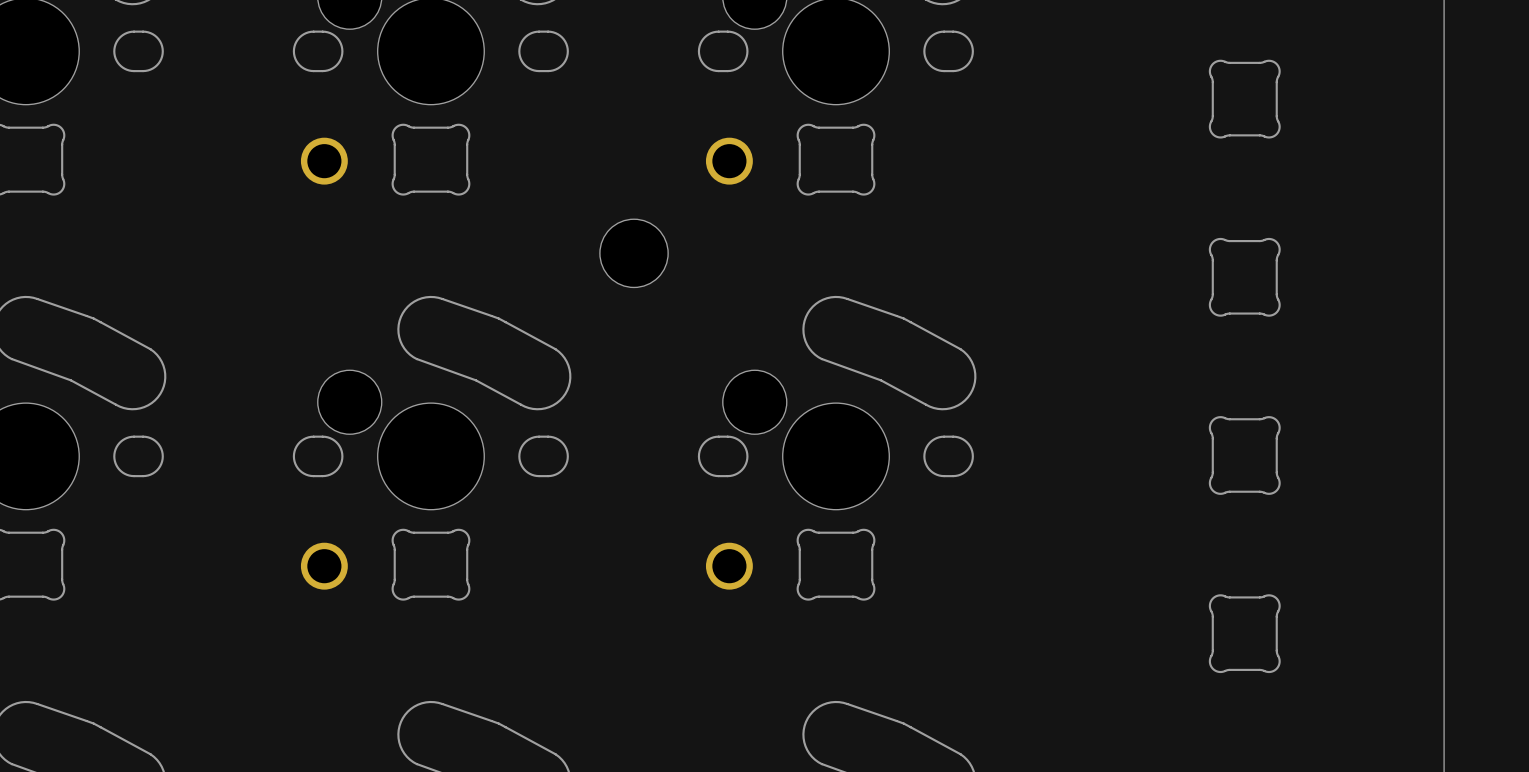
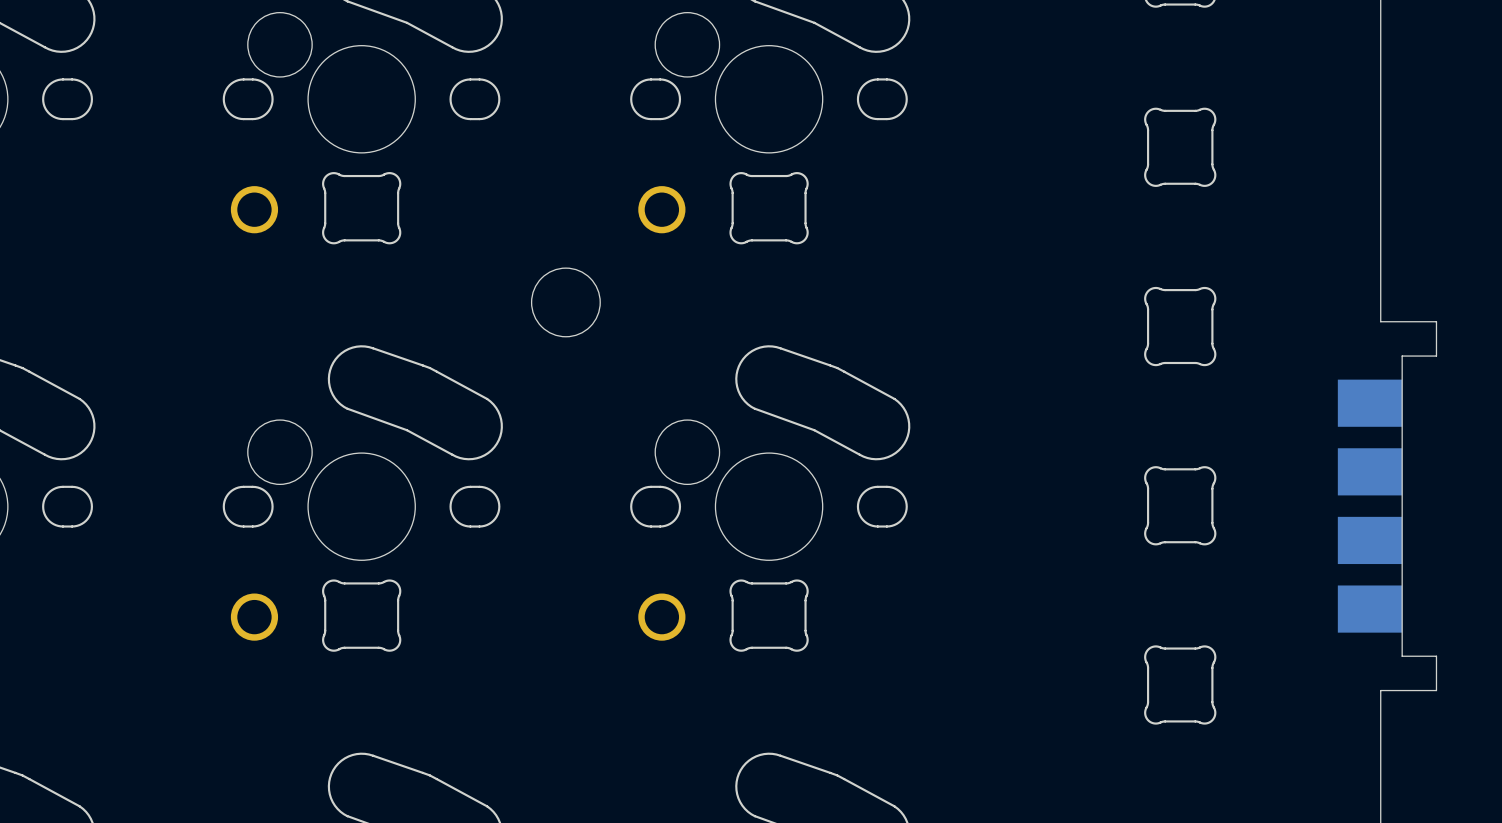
board edge: (1444, 272) (1444, 639) -> none
part: none -> (1387, 506)

